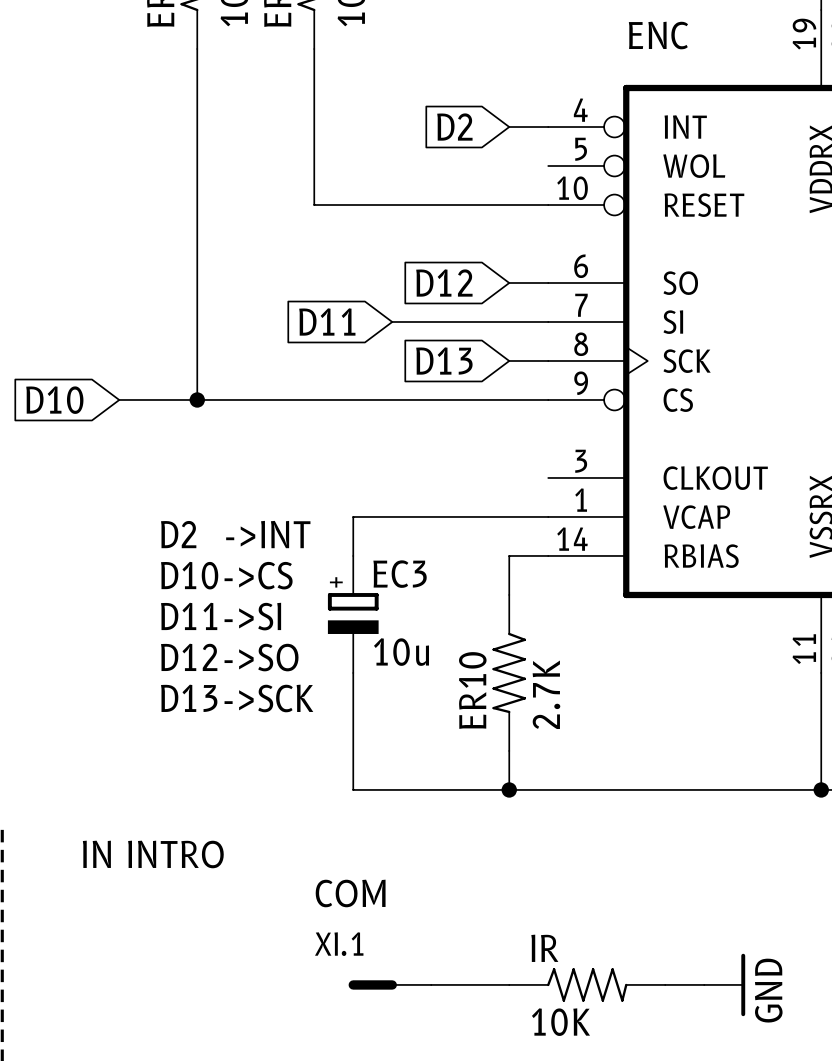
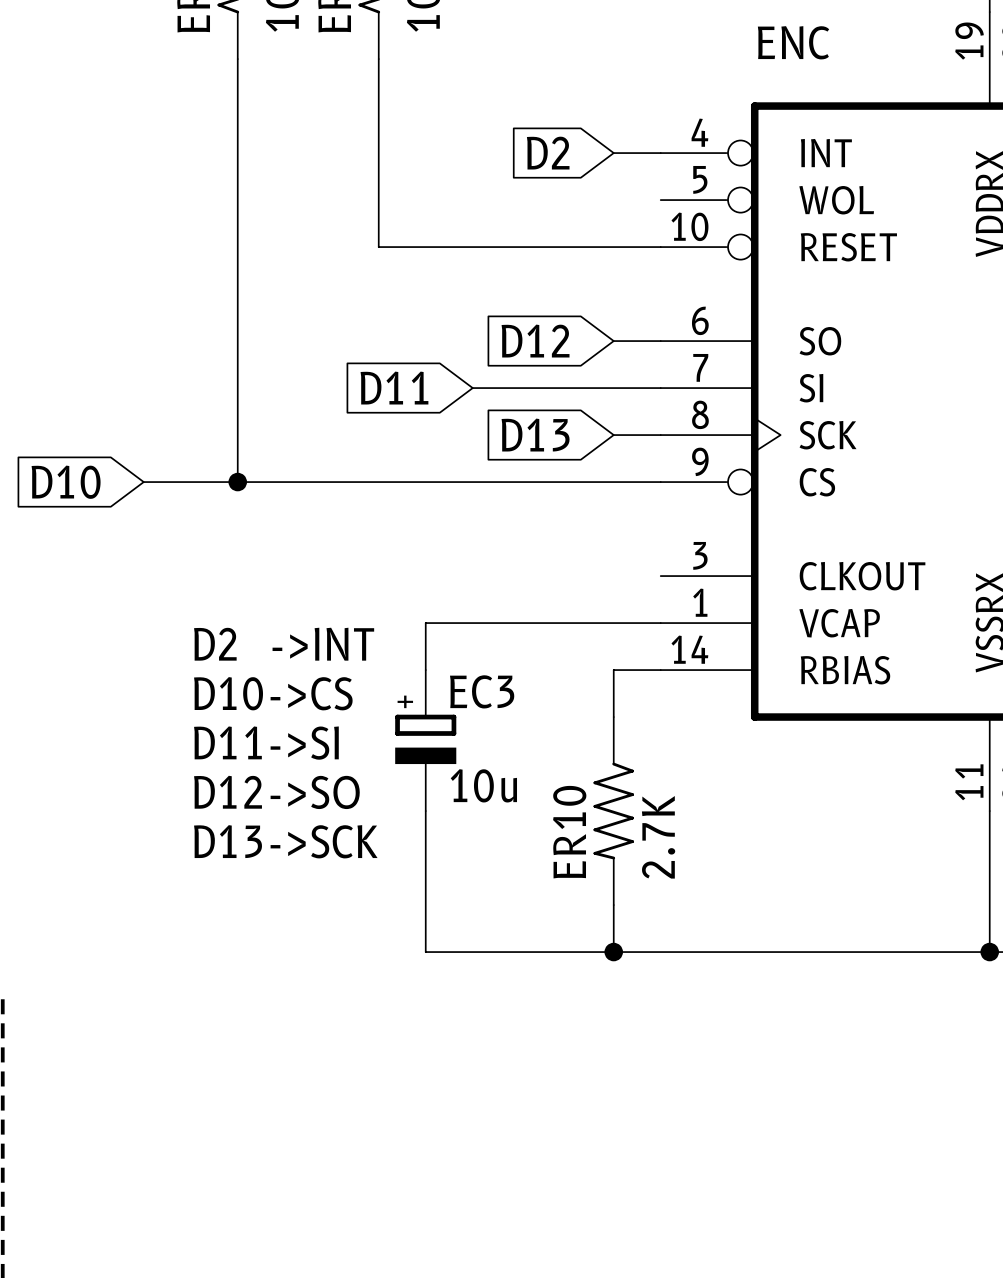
text: IN INTRO (153, 854) -> none
text: COM (350, 893) -> none
XI.1: (389, 984) -> none
wire: (431, 984) (509, 984) -> none
IR: 10K (587, 984) -> none
wire: (665, 984) (704, 984) -> none
power symbol: GND (724, 984) -> none

